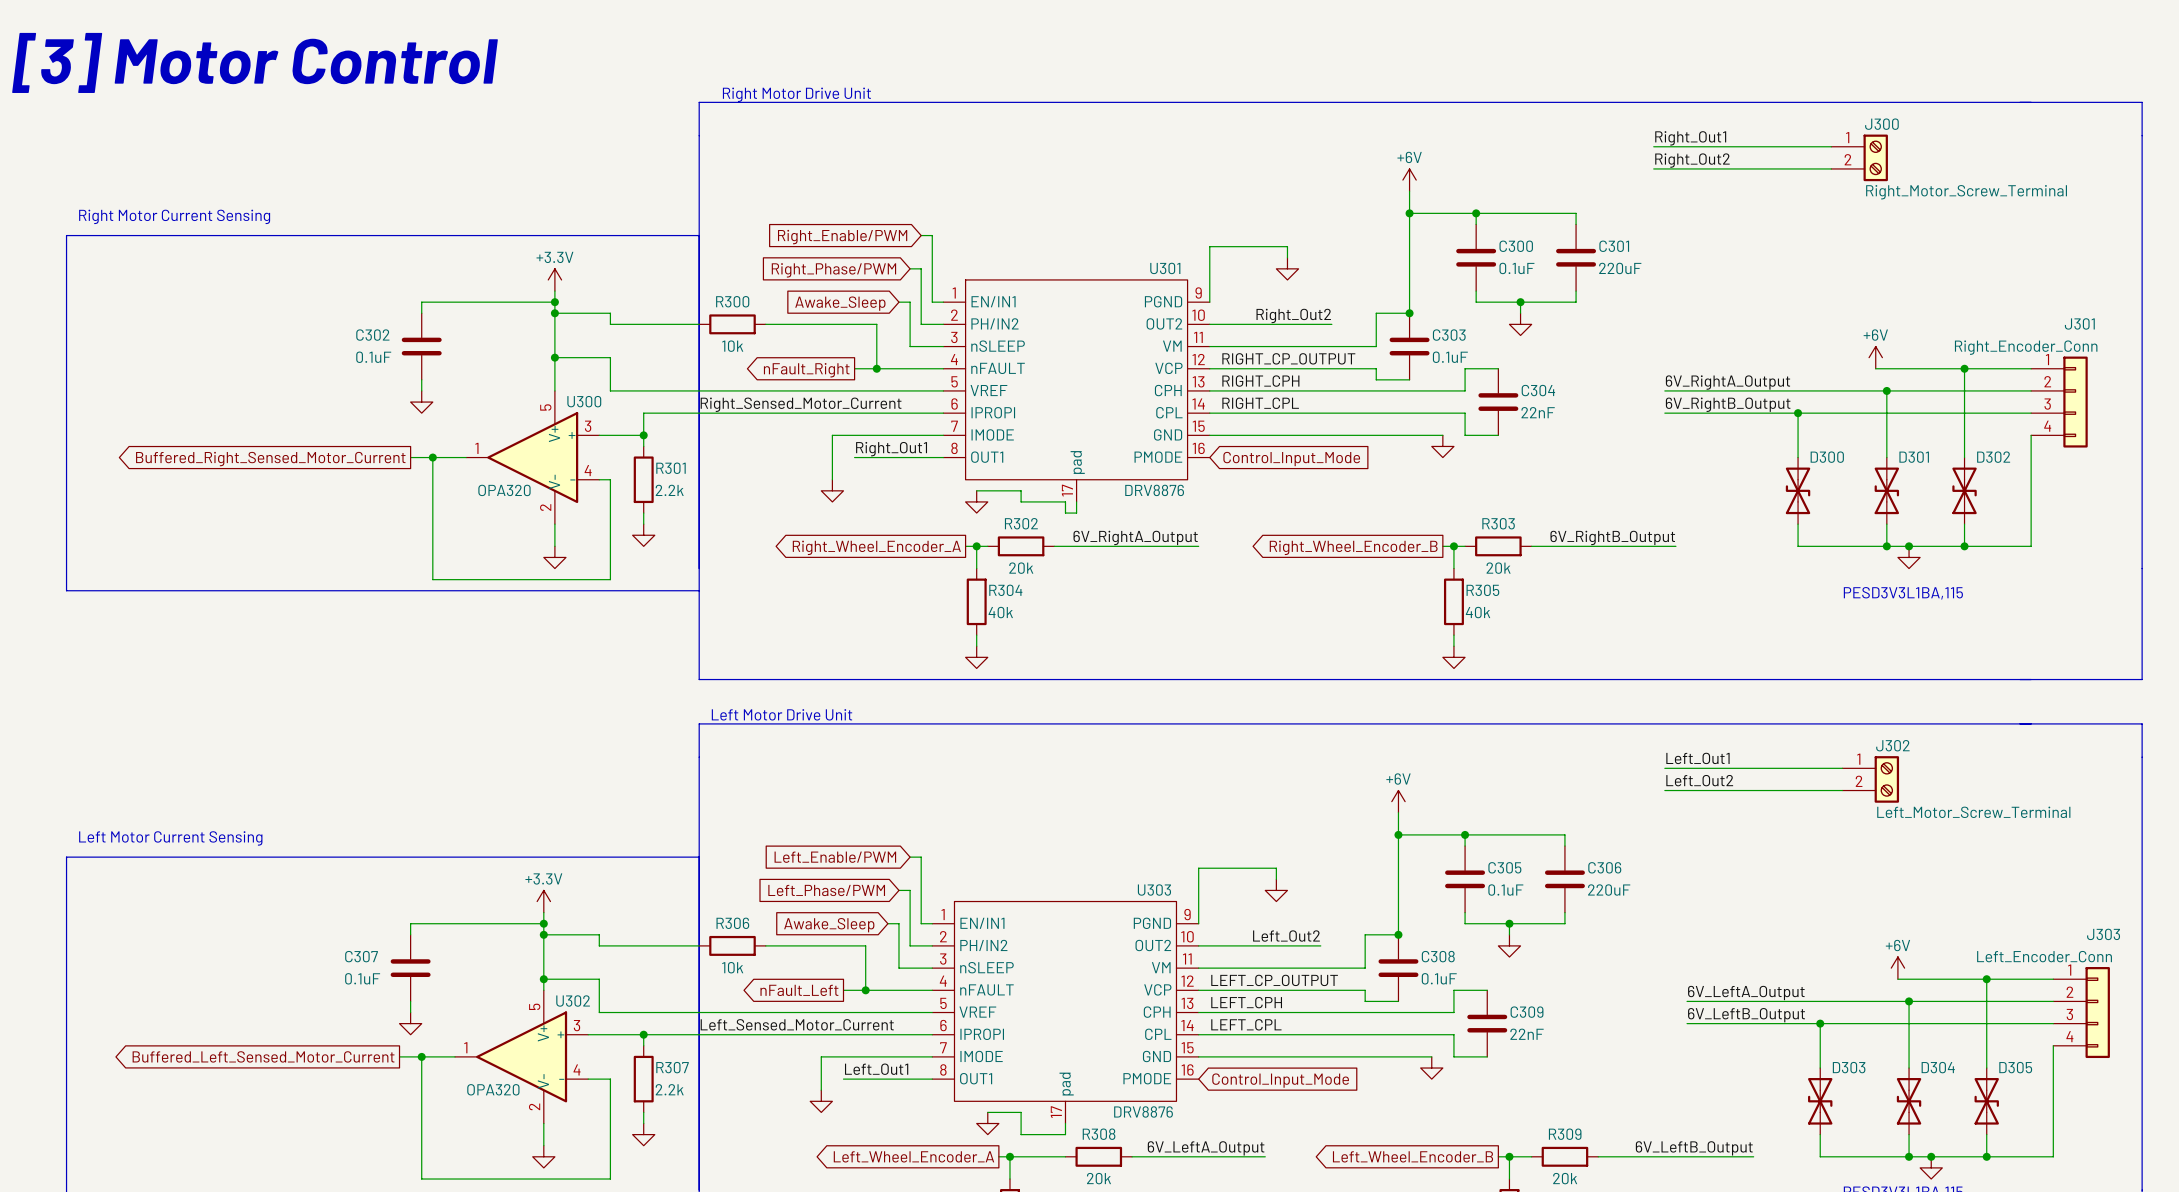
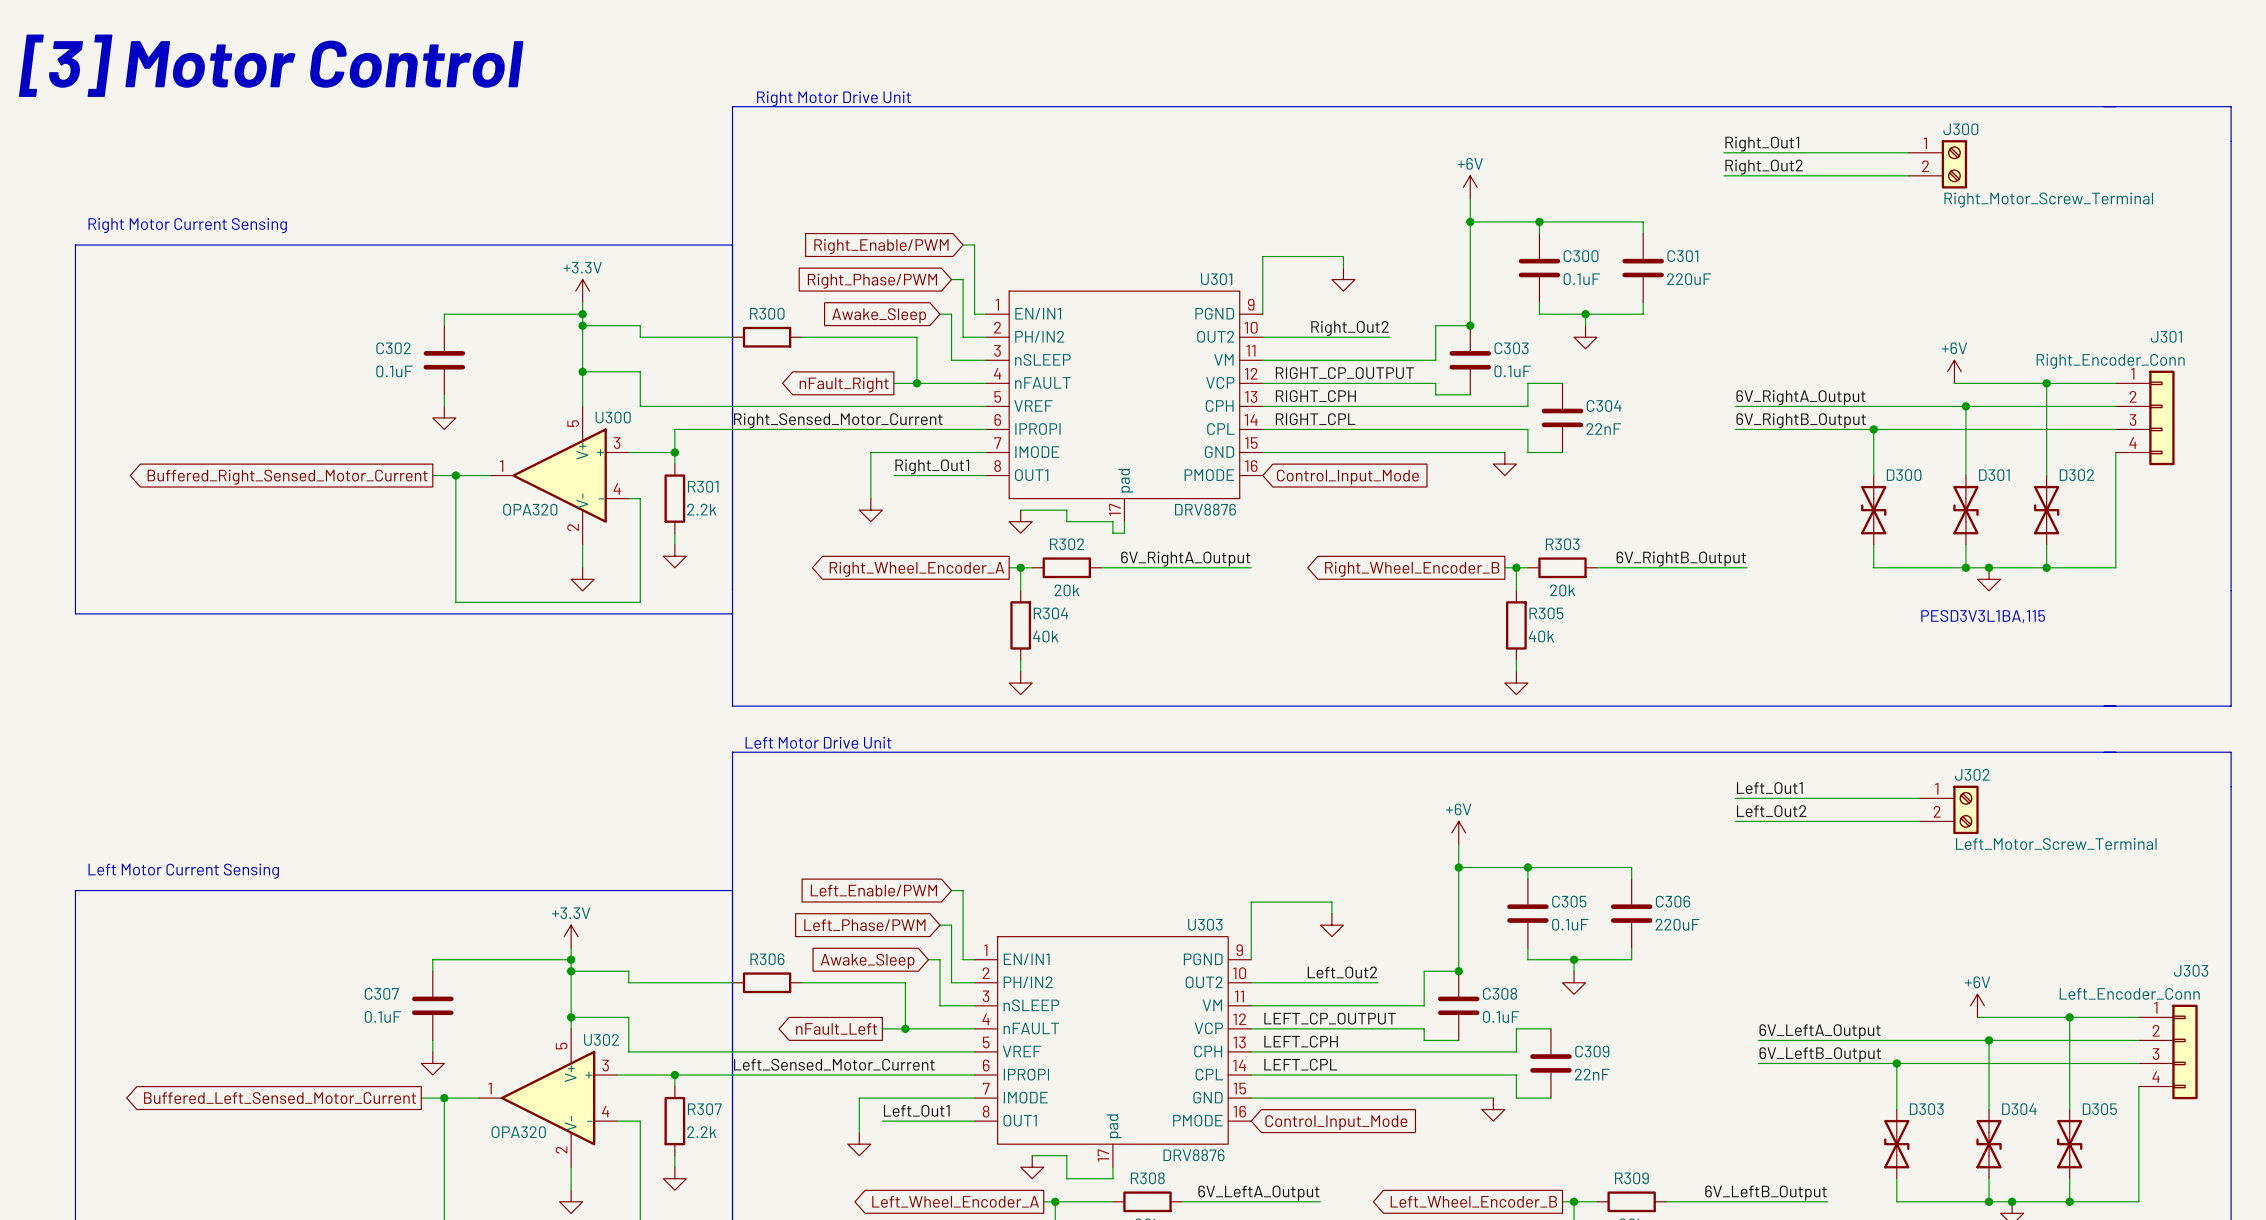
R300 value: 10k (732, 346) -> none
R306 value: 10k (732, 967) -> none

